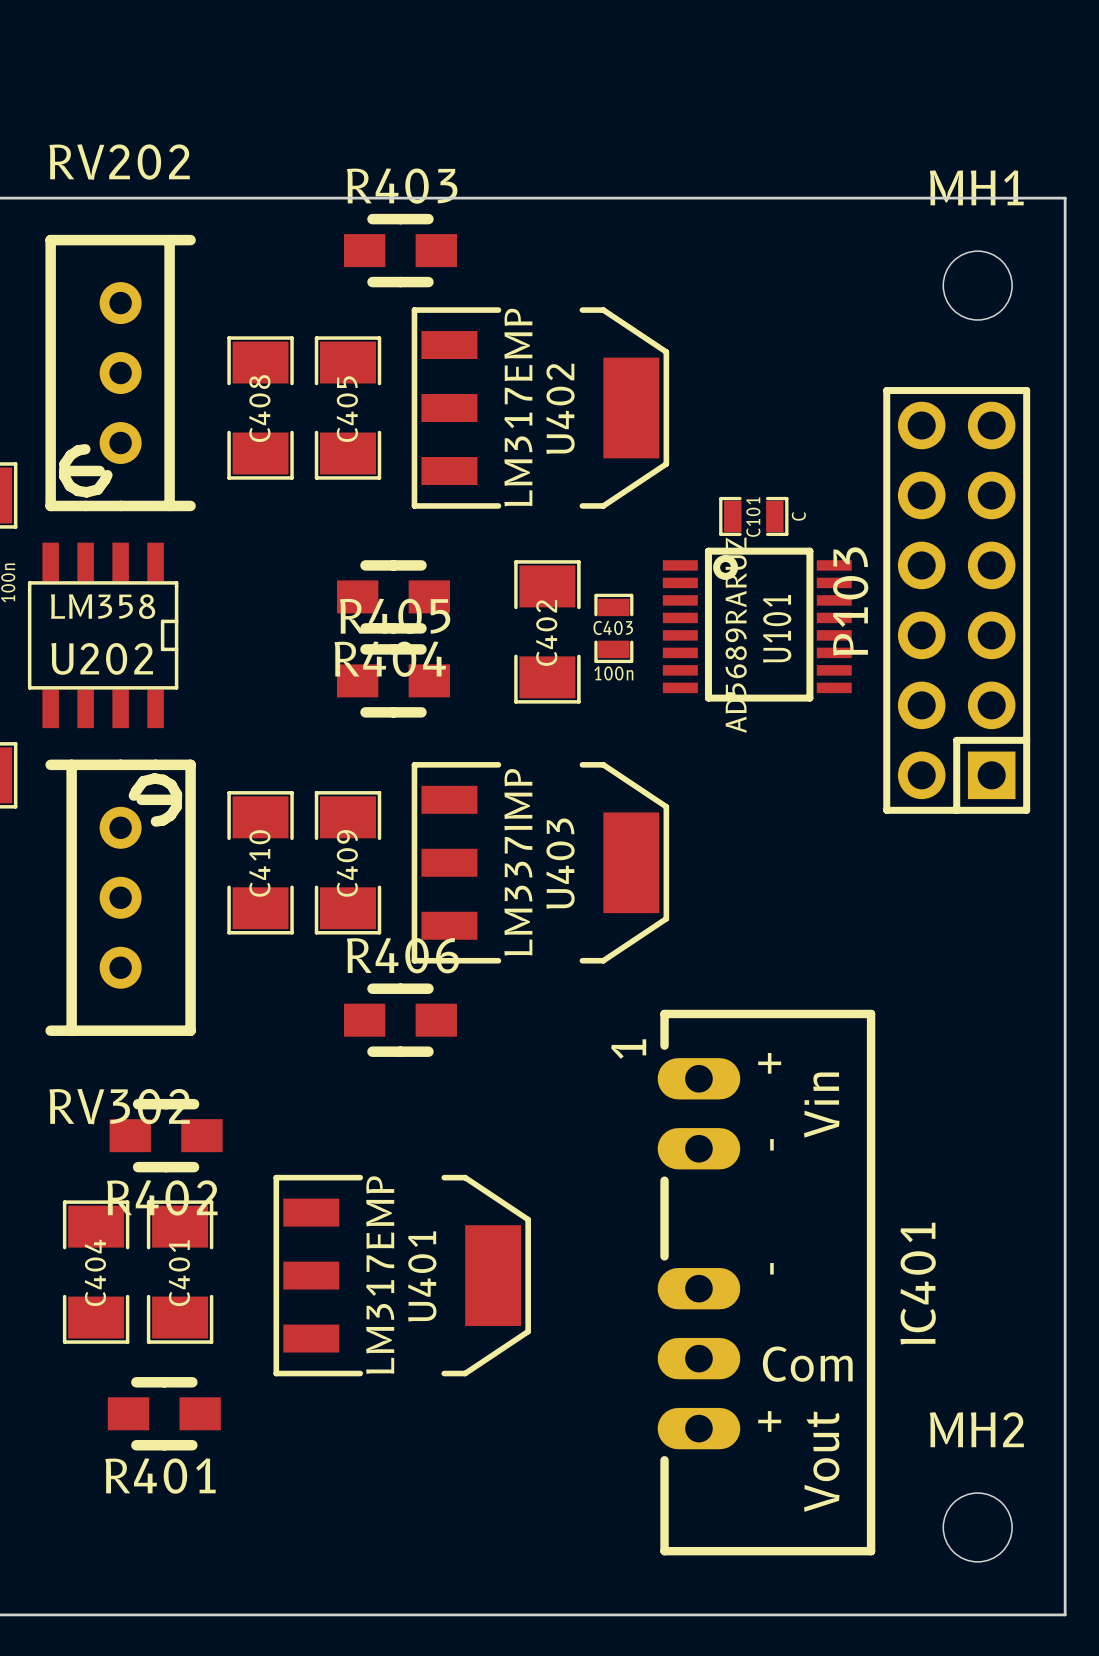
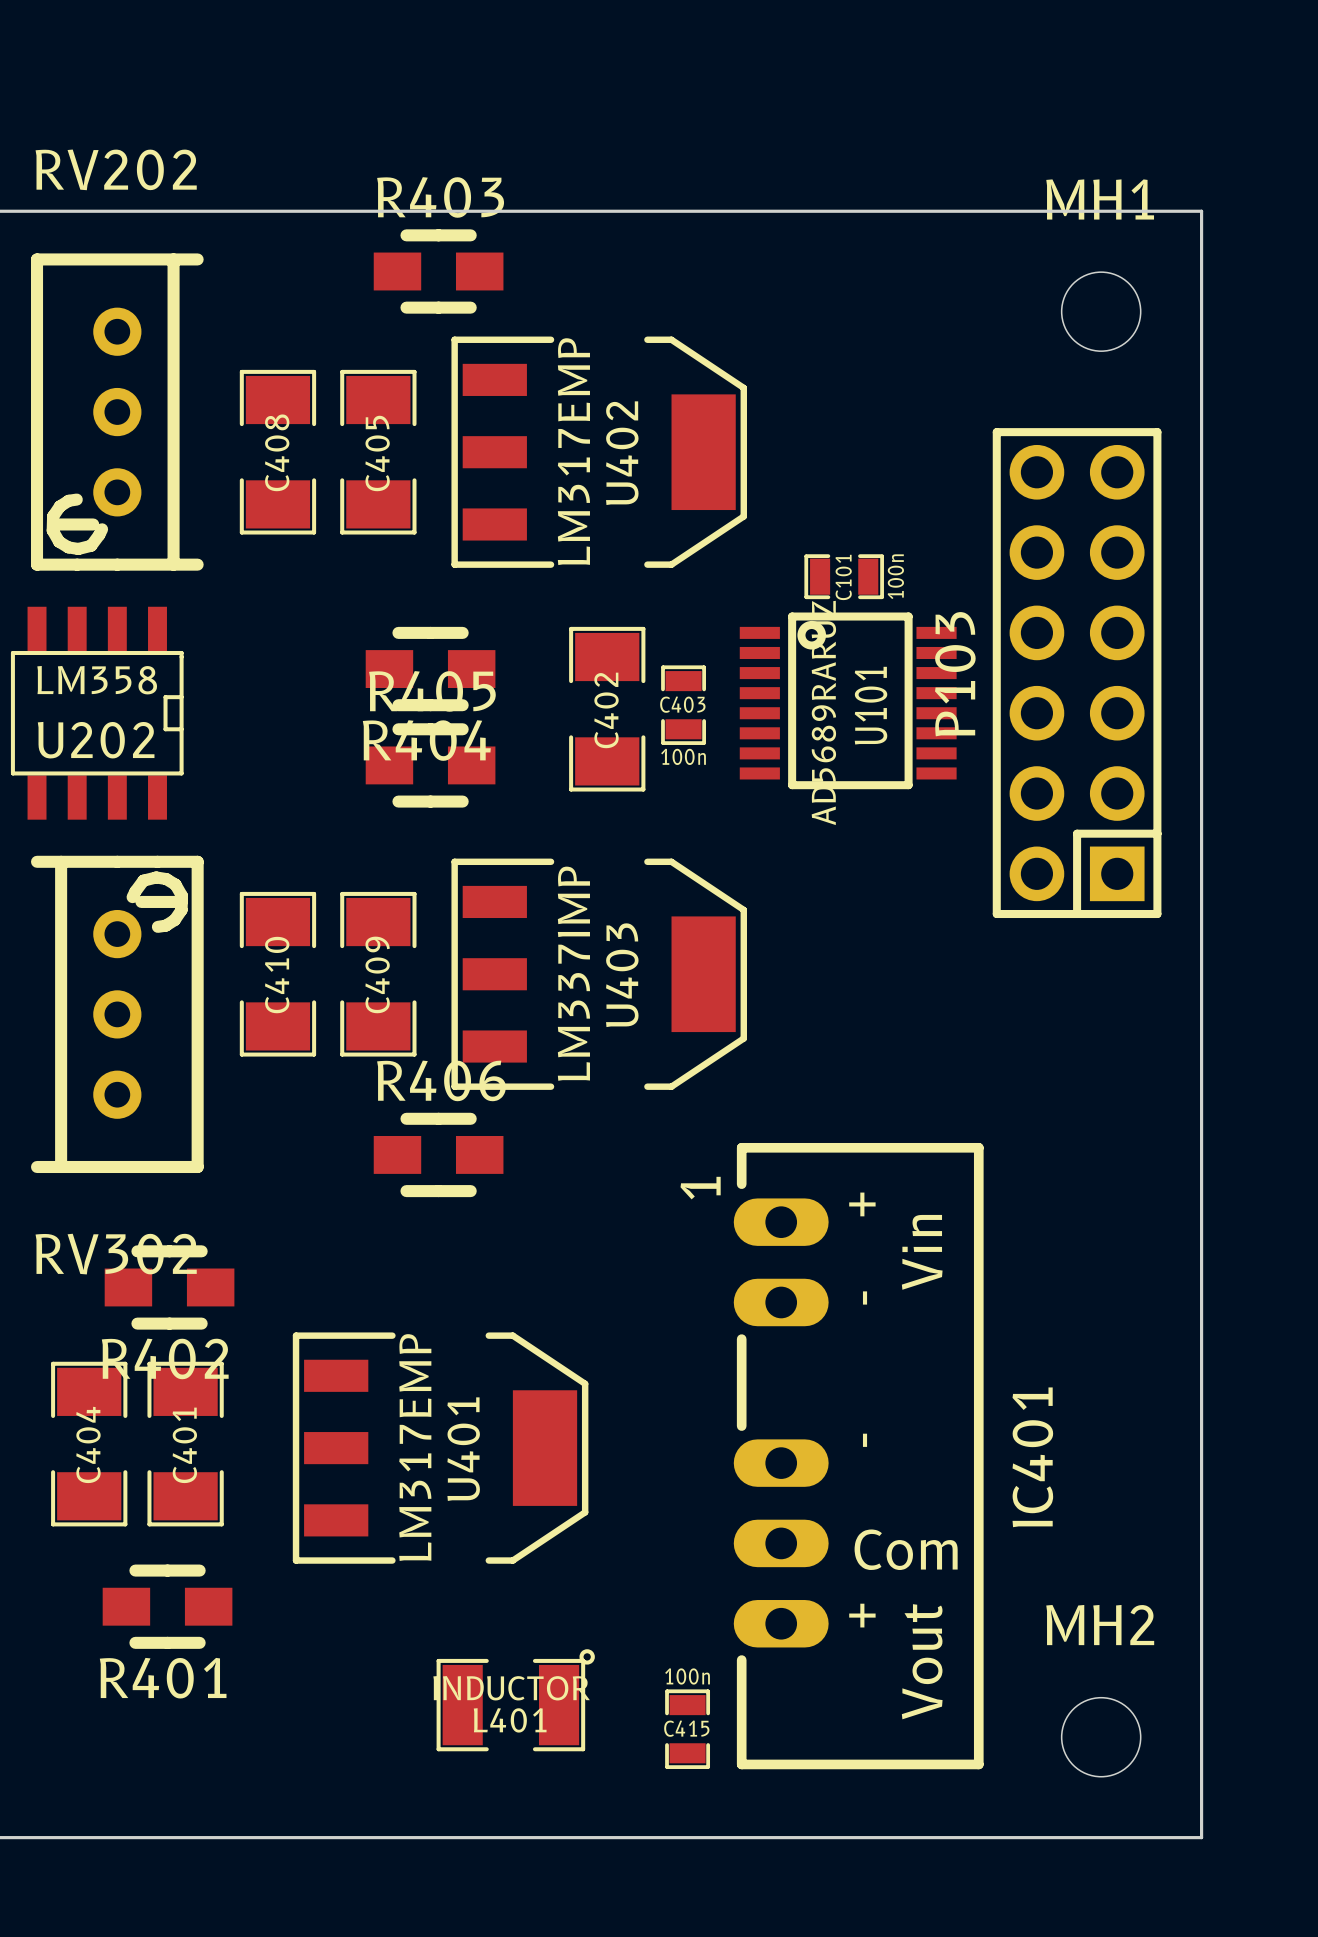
C101 value: C (798, 516) -> 100n (895, 576)
L401: none -> INDUCTOR (515, 1700)
C415: none -> 100n (687, 1729)

